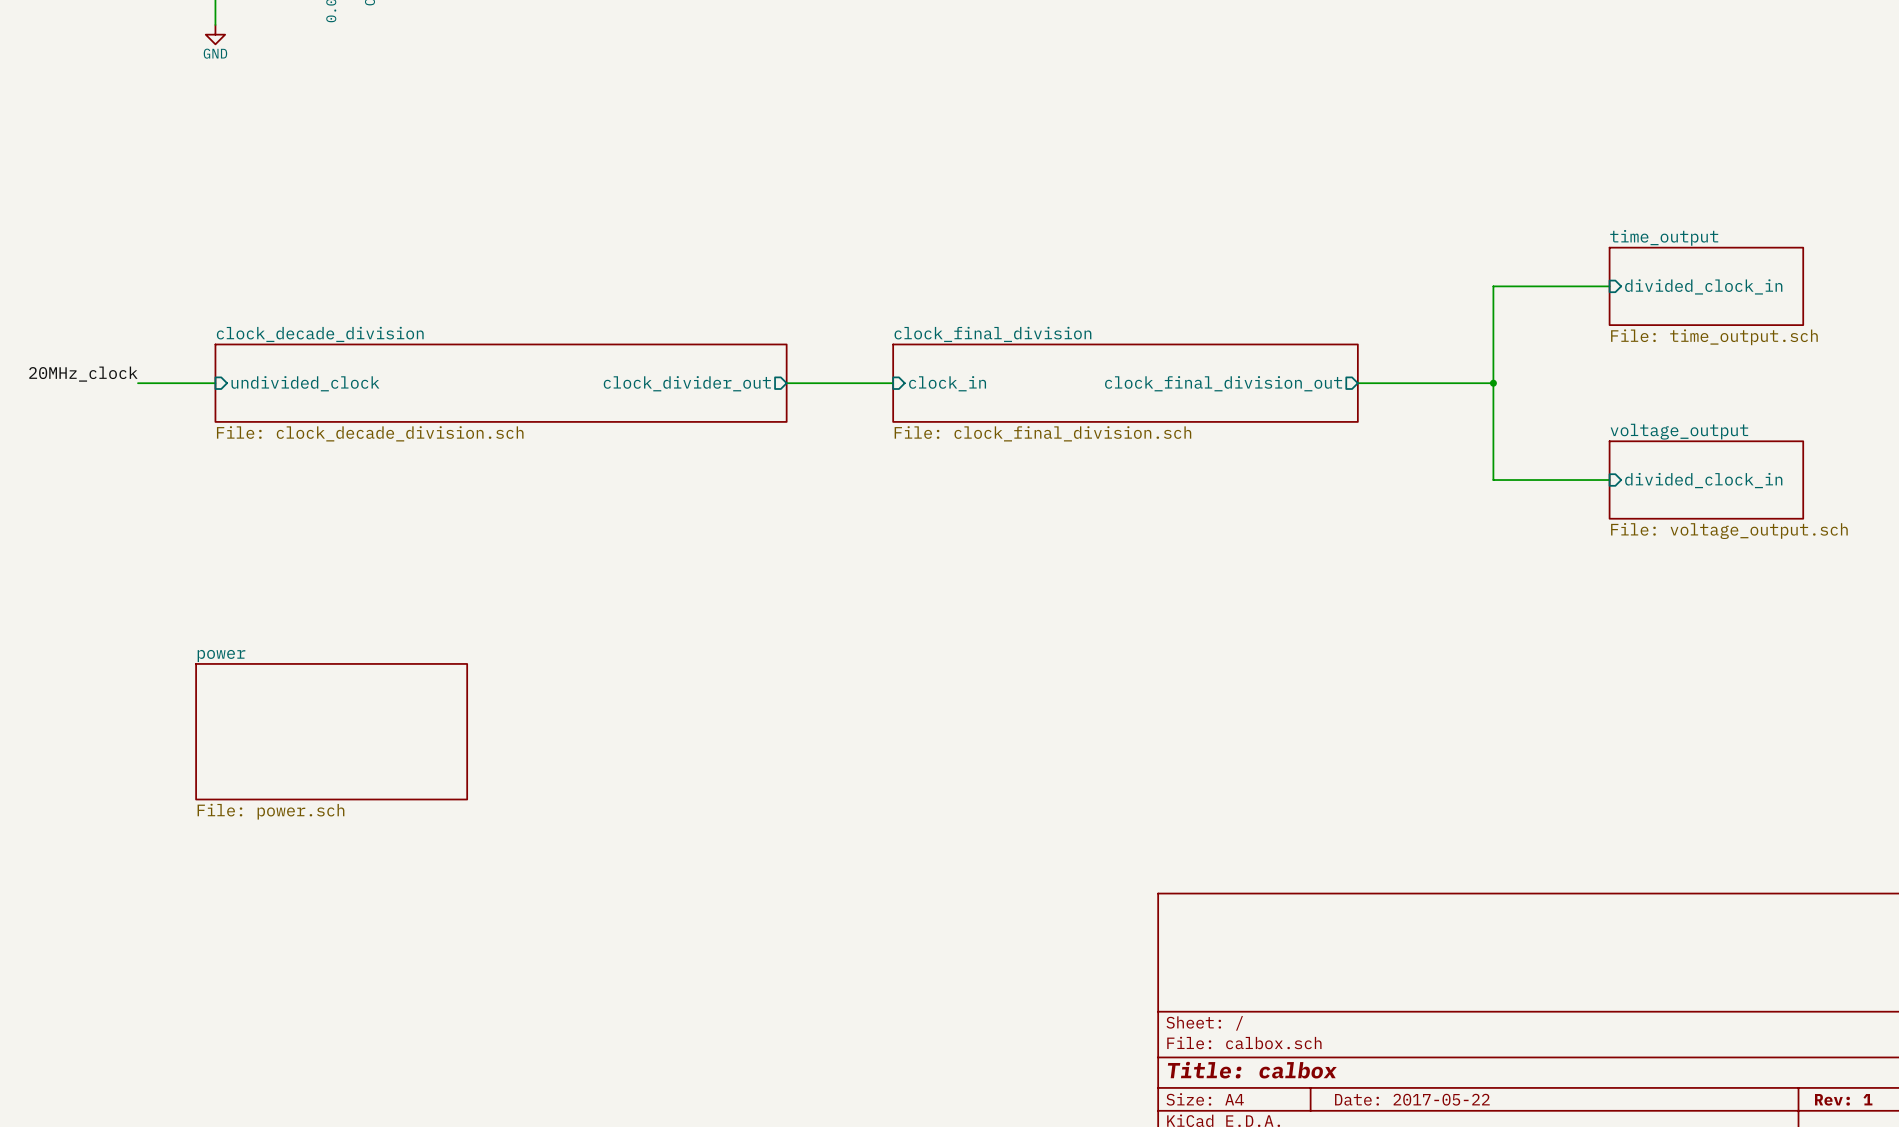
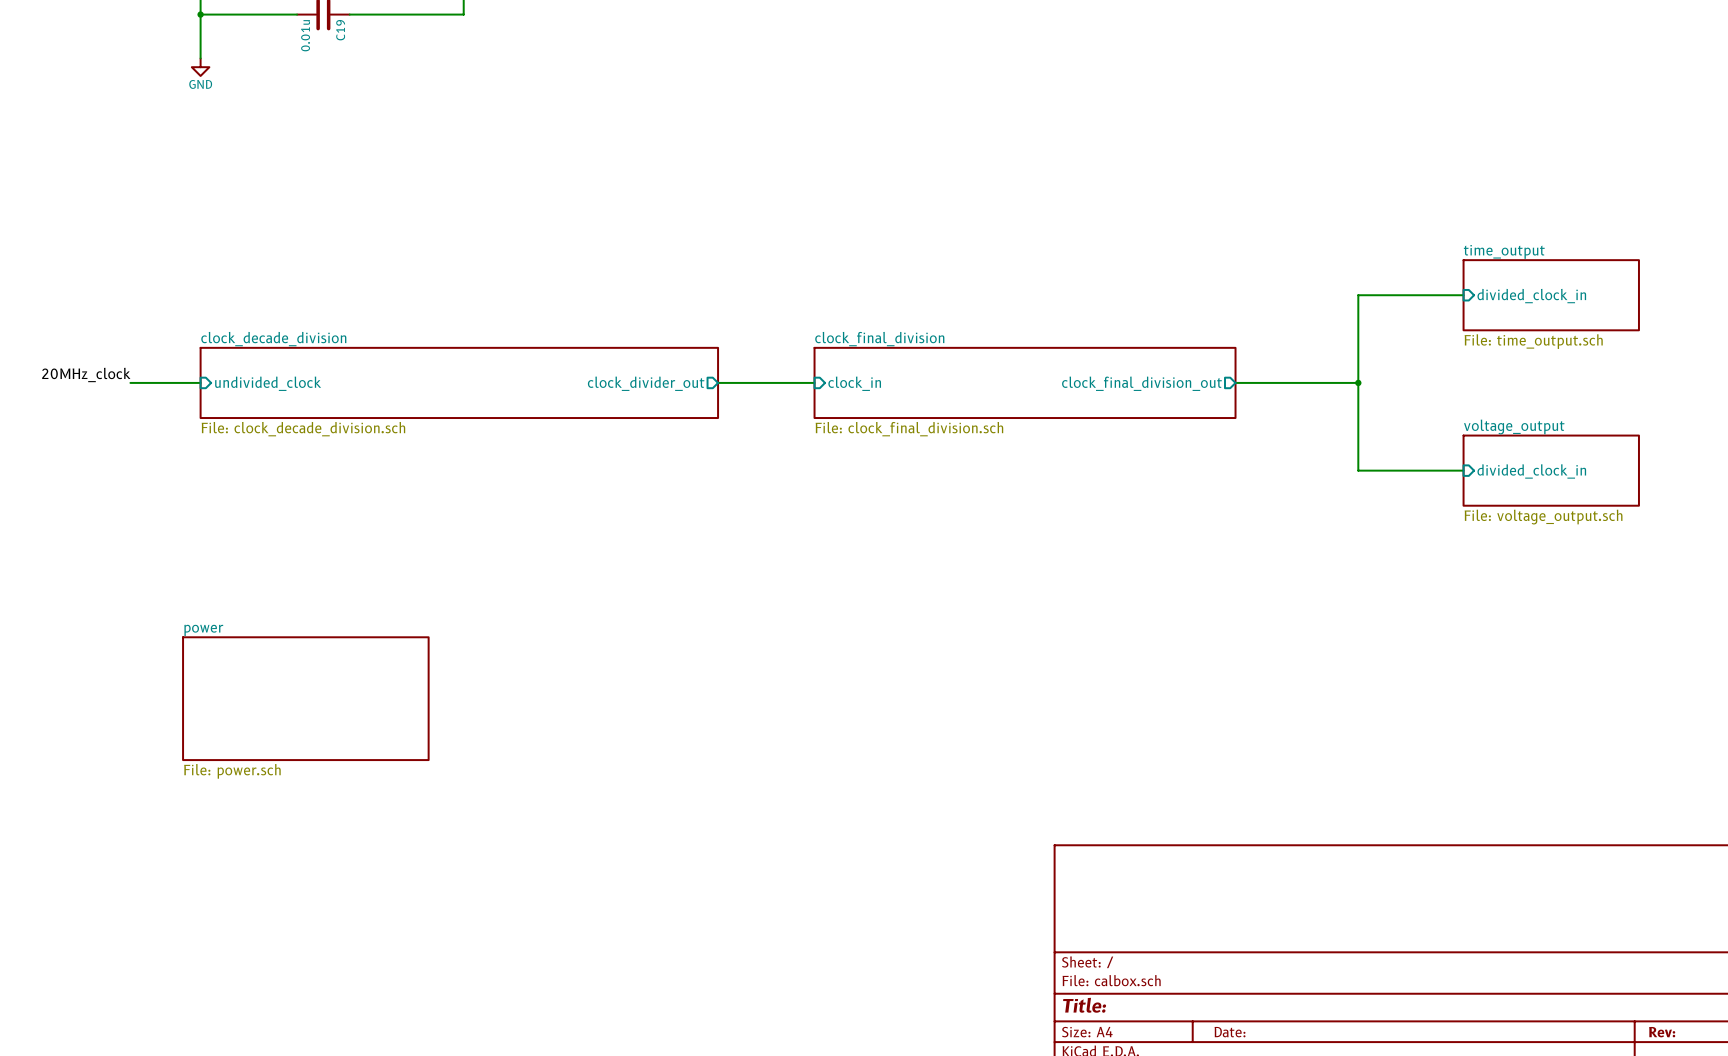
title block: Title: calbox (1252, 1070) -> Title: (1084, 1005)
title block: Date: 2017-05-22 (1412, 1099) -> Date: (1230, 1032)
title block: Rev: 1 (1843, 1099) -> Rev: (1662, 1032)

